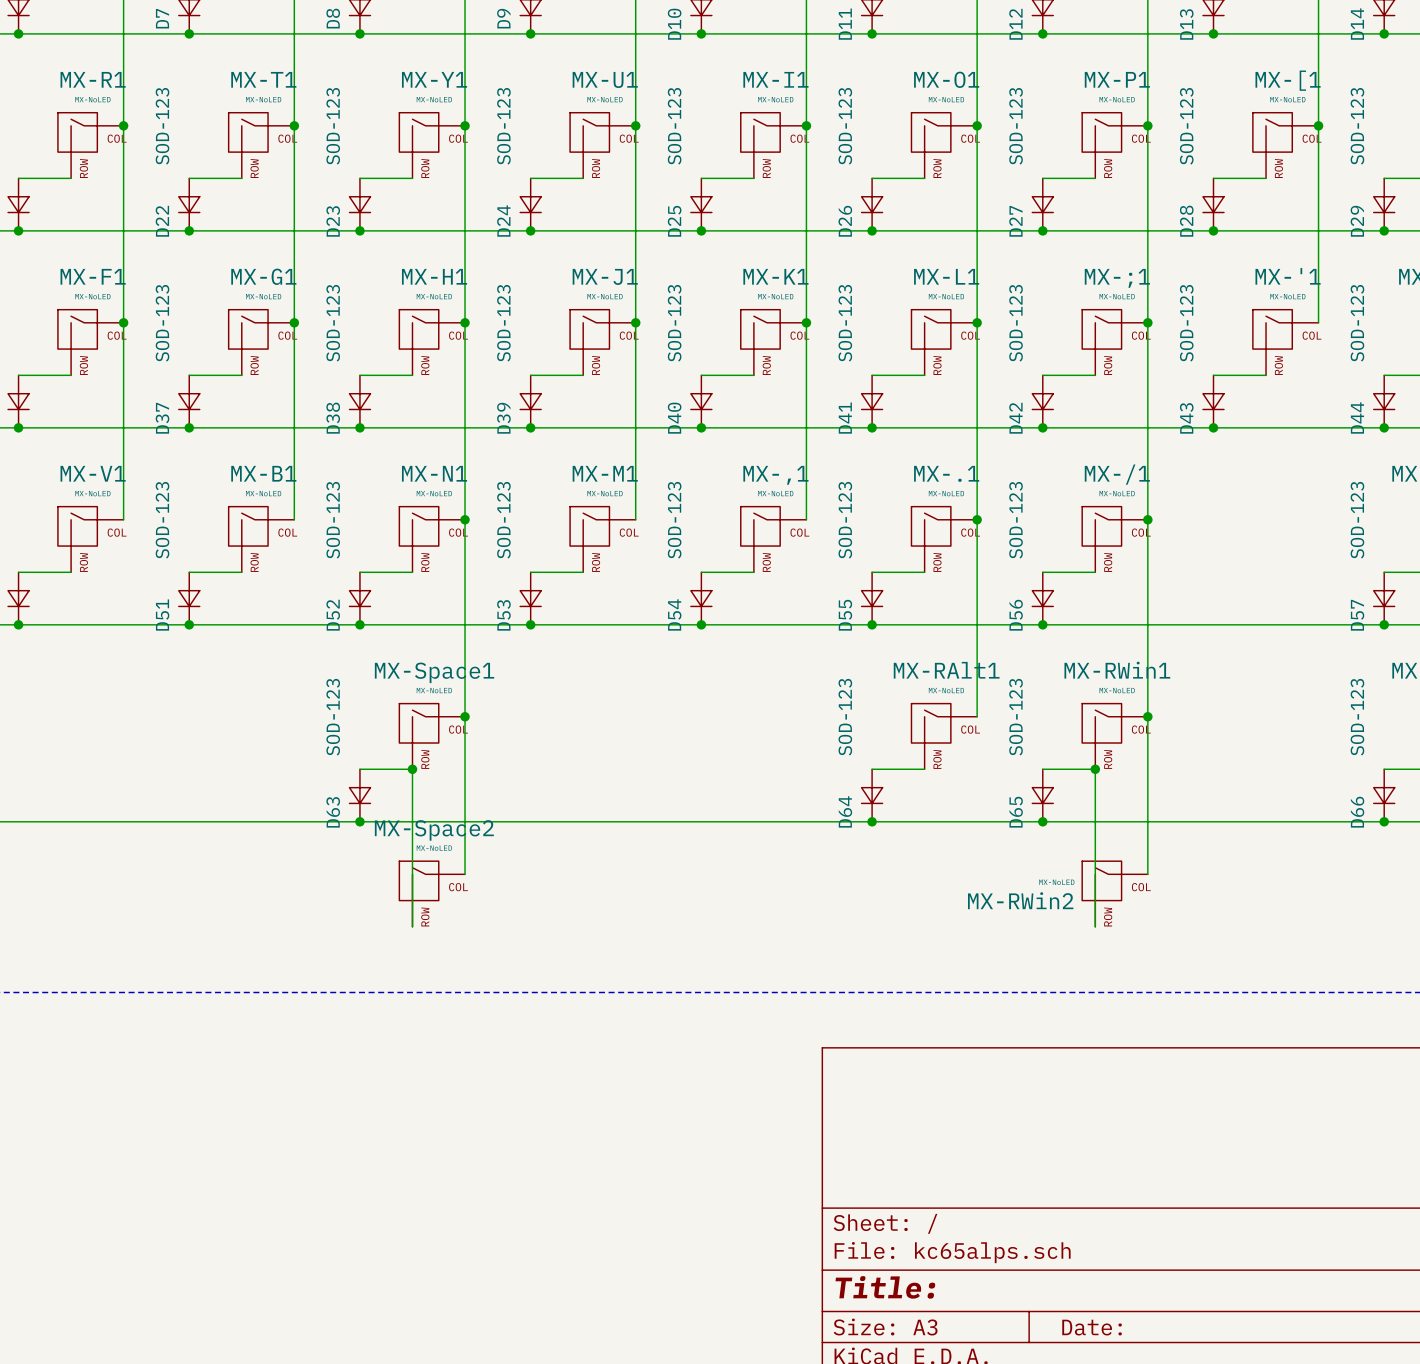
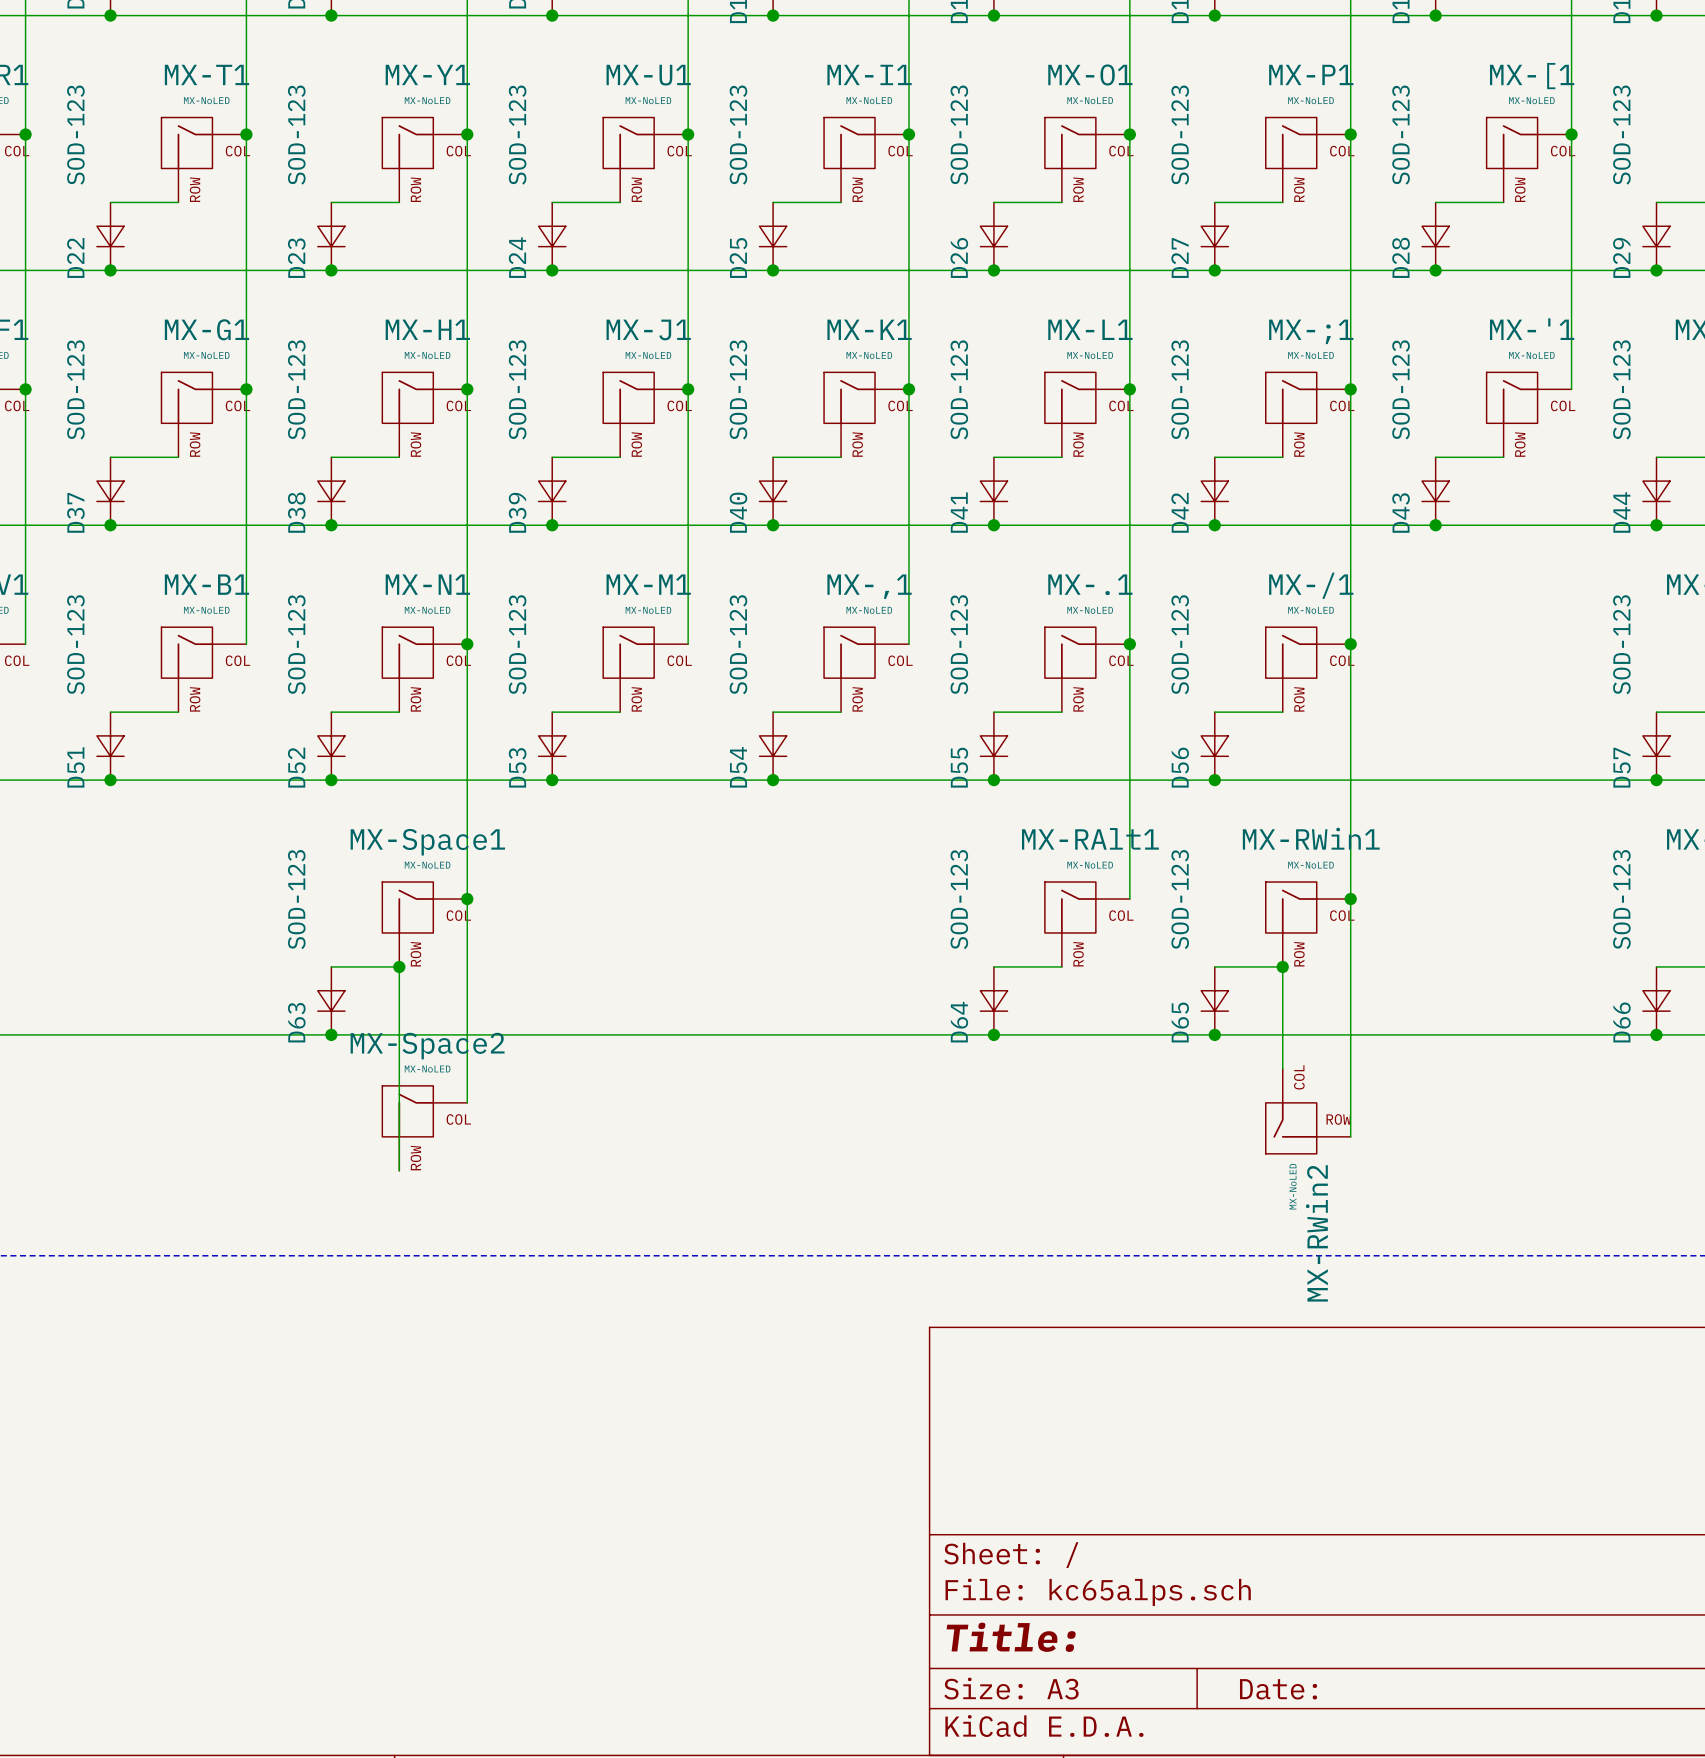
wire: none -> (1350, 1102) (1350, 1136)
MX-RWin2 rotation: 0° (1102, 881) -> 90° counterclockwise (1291, 1127)

